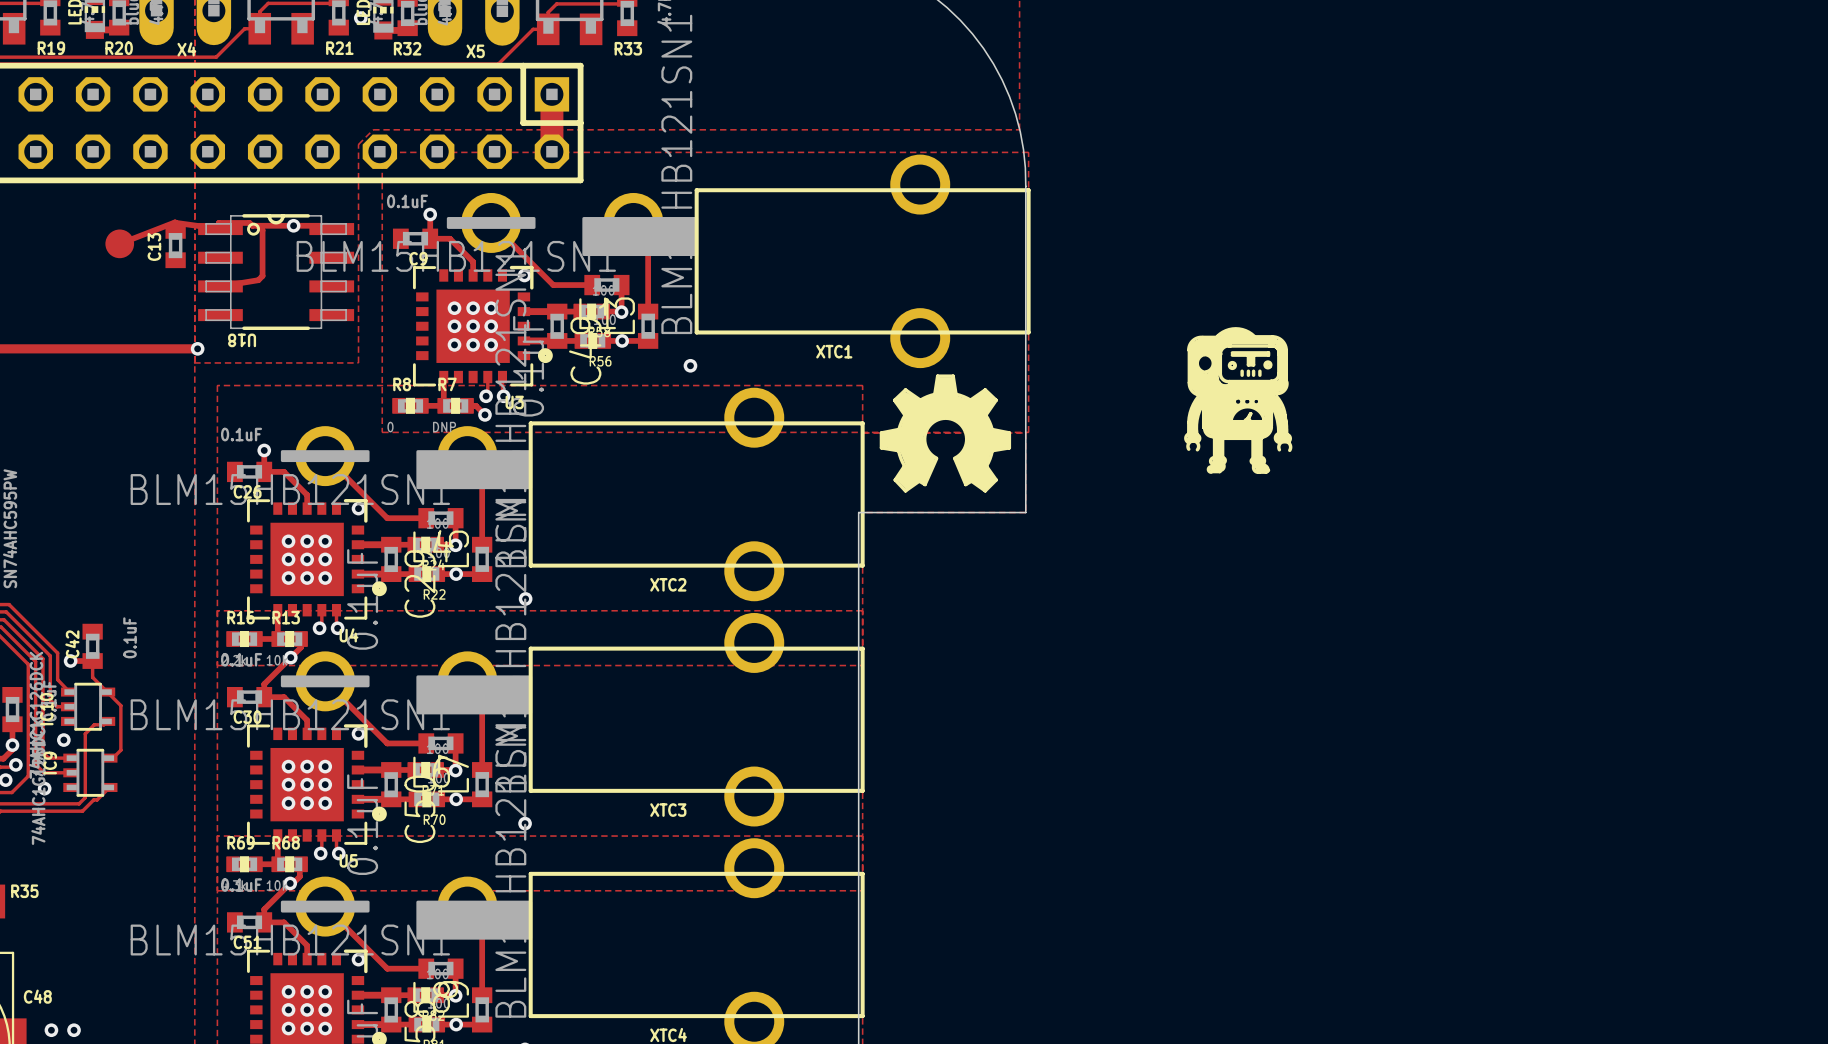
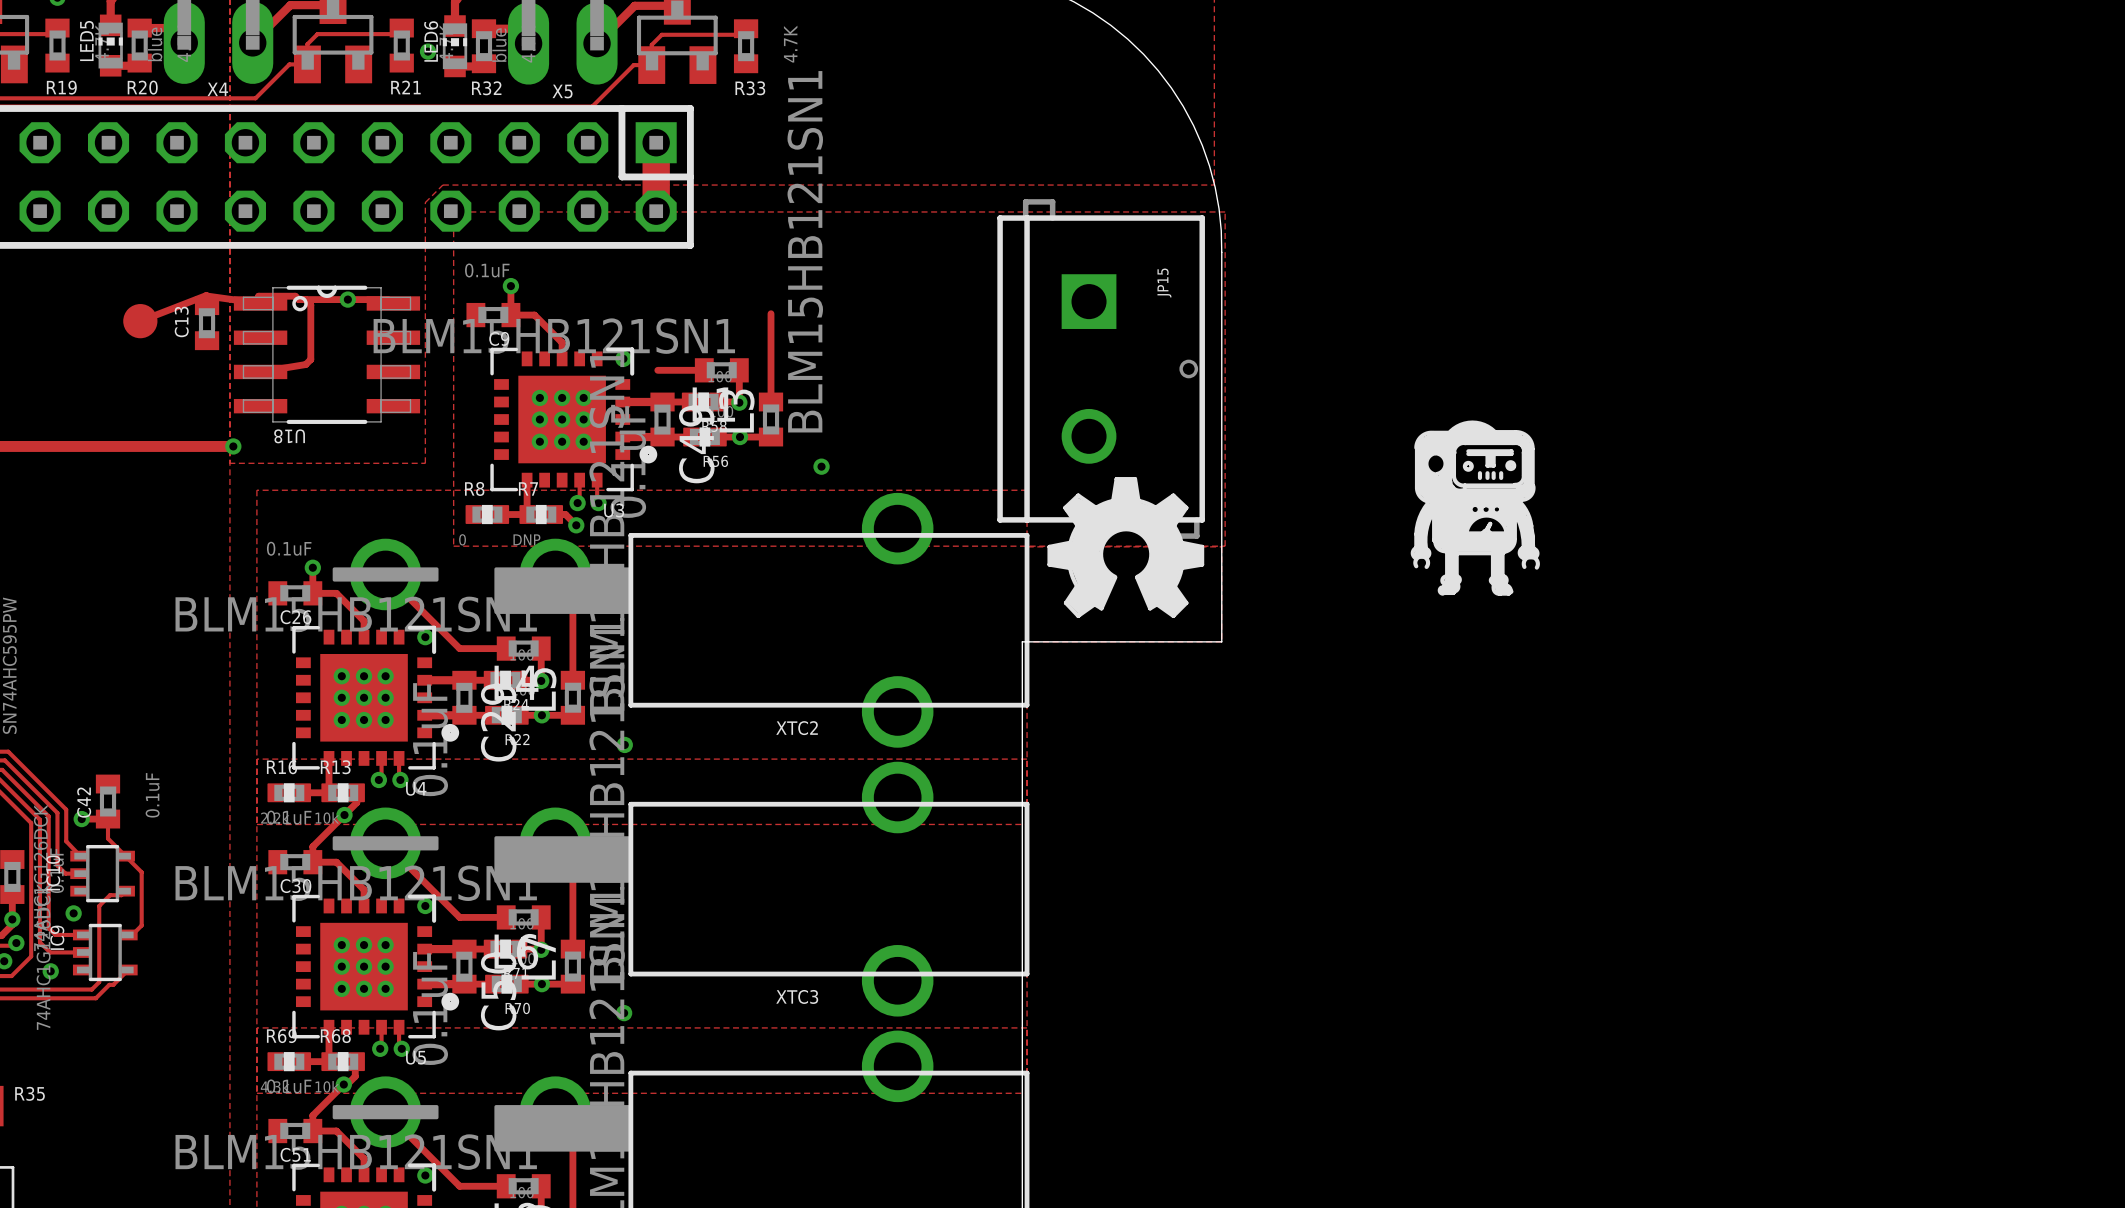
track: (491, 222) (553, 285) -> none
XTC1: (738, 261) -> none
JP15: none -> (1101, 368)

